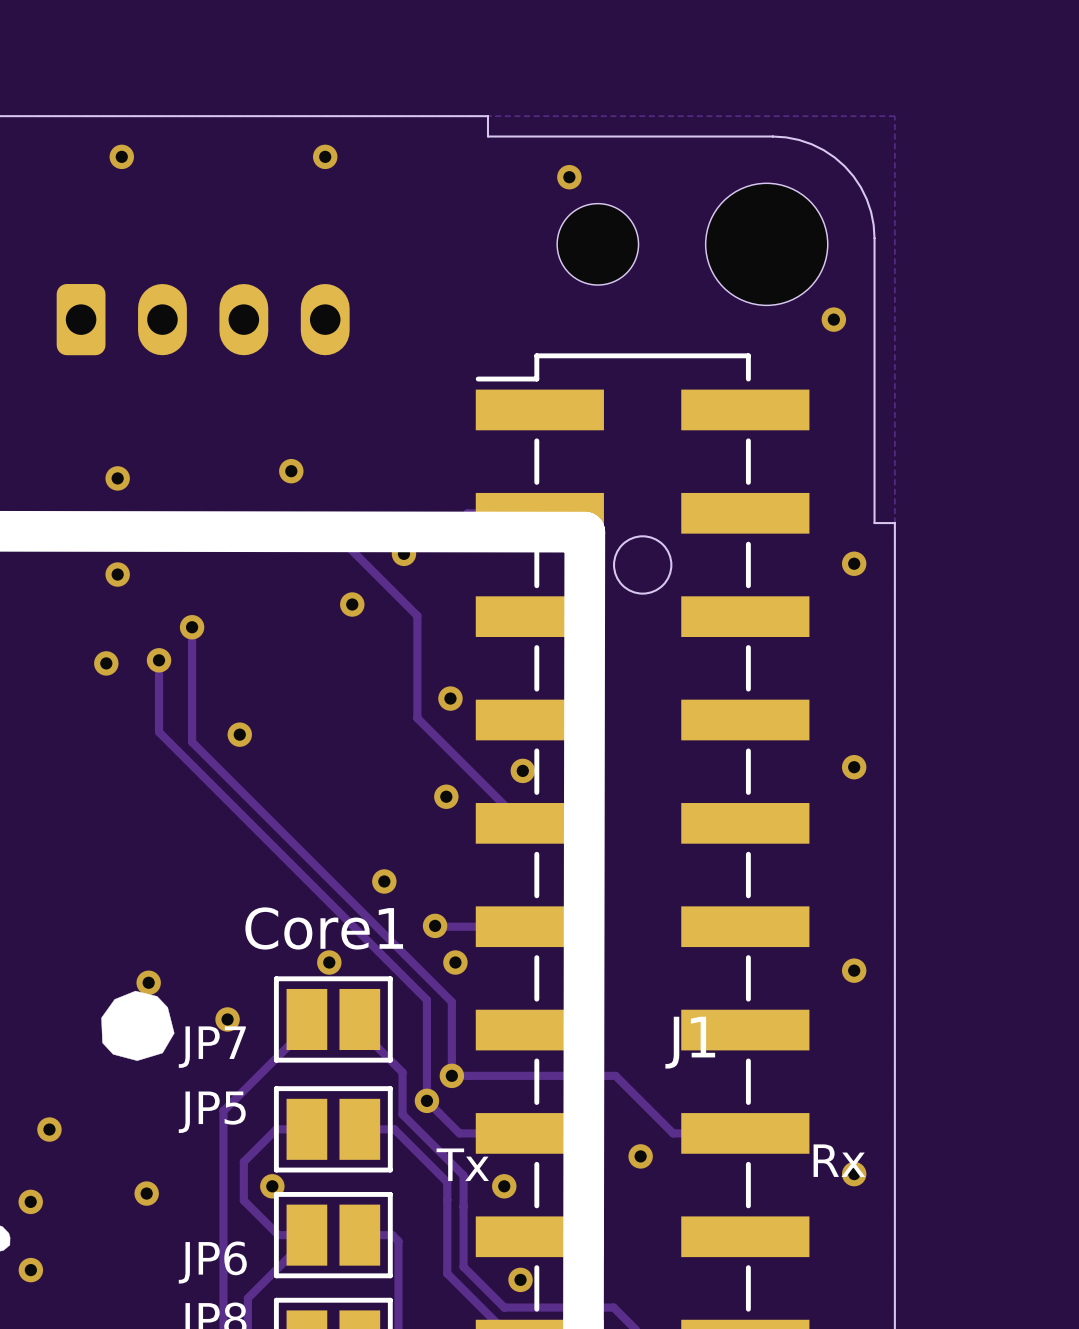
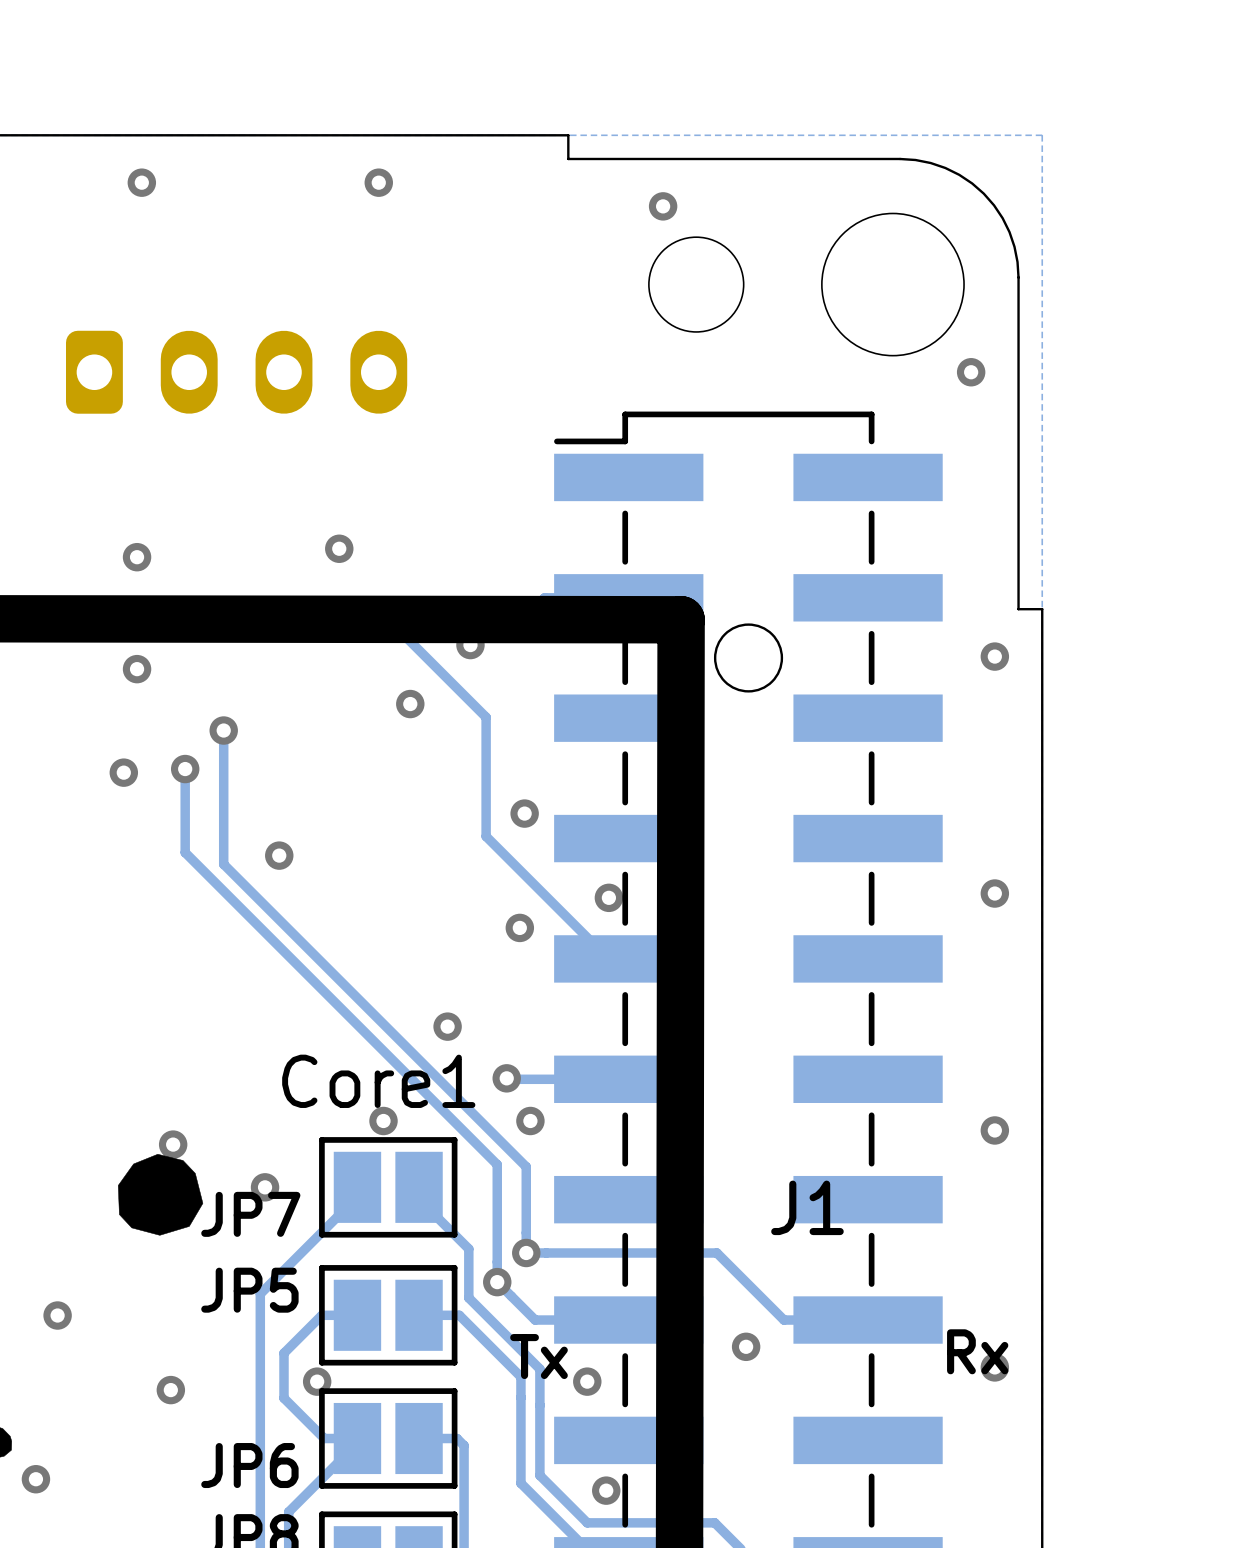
via: (30, 1201) -> none

